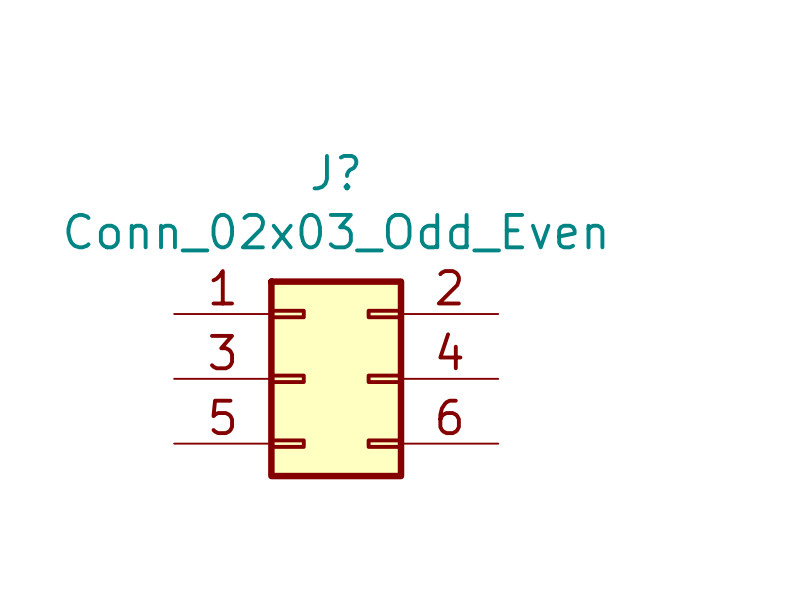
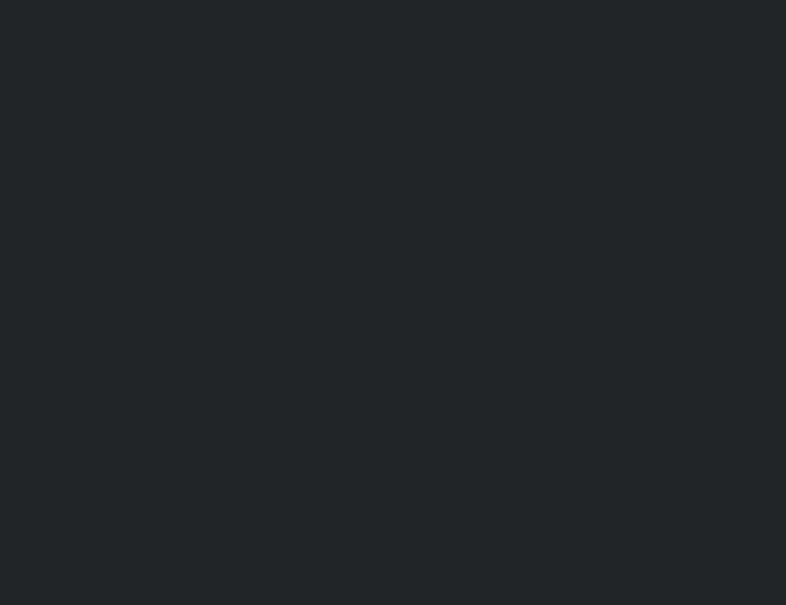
J?: Conn_02x03_Odd_Even (336, 378) -> none

